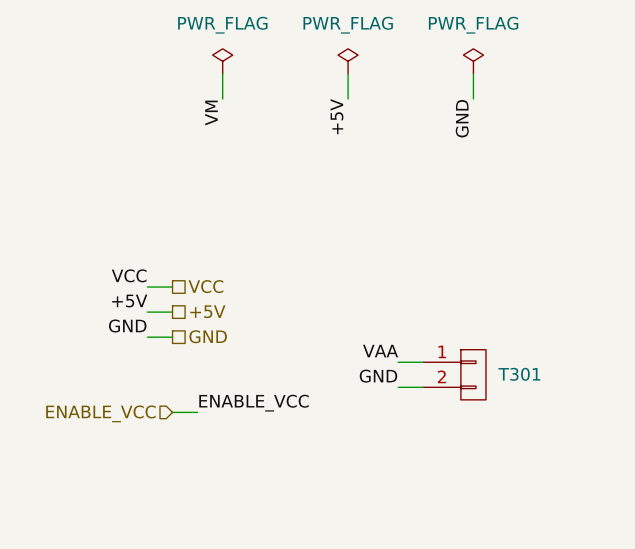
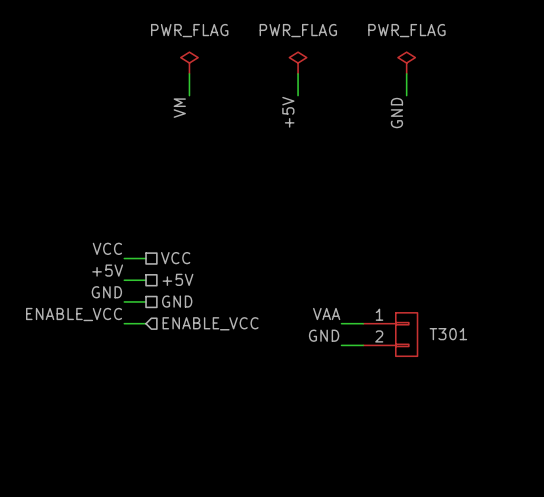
label position: ENABLE_VCC (254, 403) -> ENABLE_VCC (74, 314)
wire: (172, 412) (197, 412) -> (124, 323) (146, 323)
hierarchical label rotation: 0° (100, 413) -> 180° (210, 323)
hierarchical label position: ENABLE_VCC (100, 413) -> ENABLE_VCC (210, 323)

